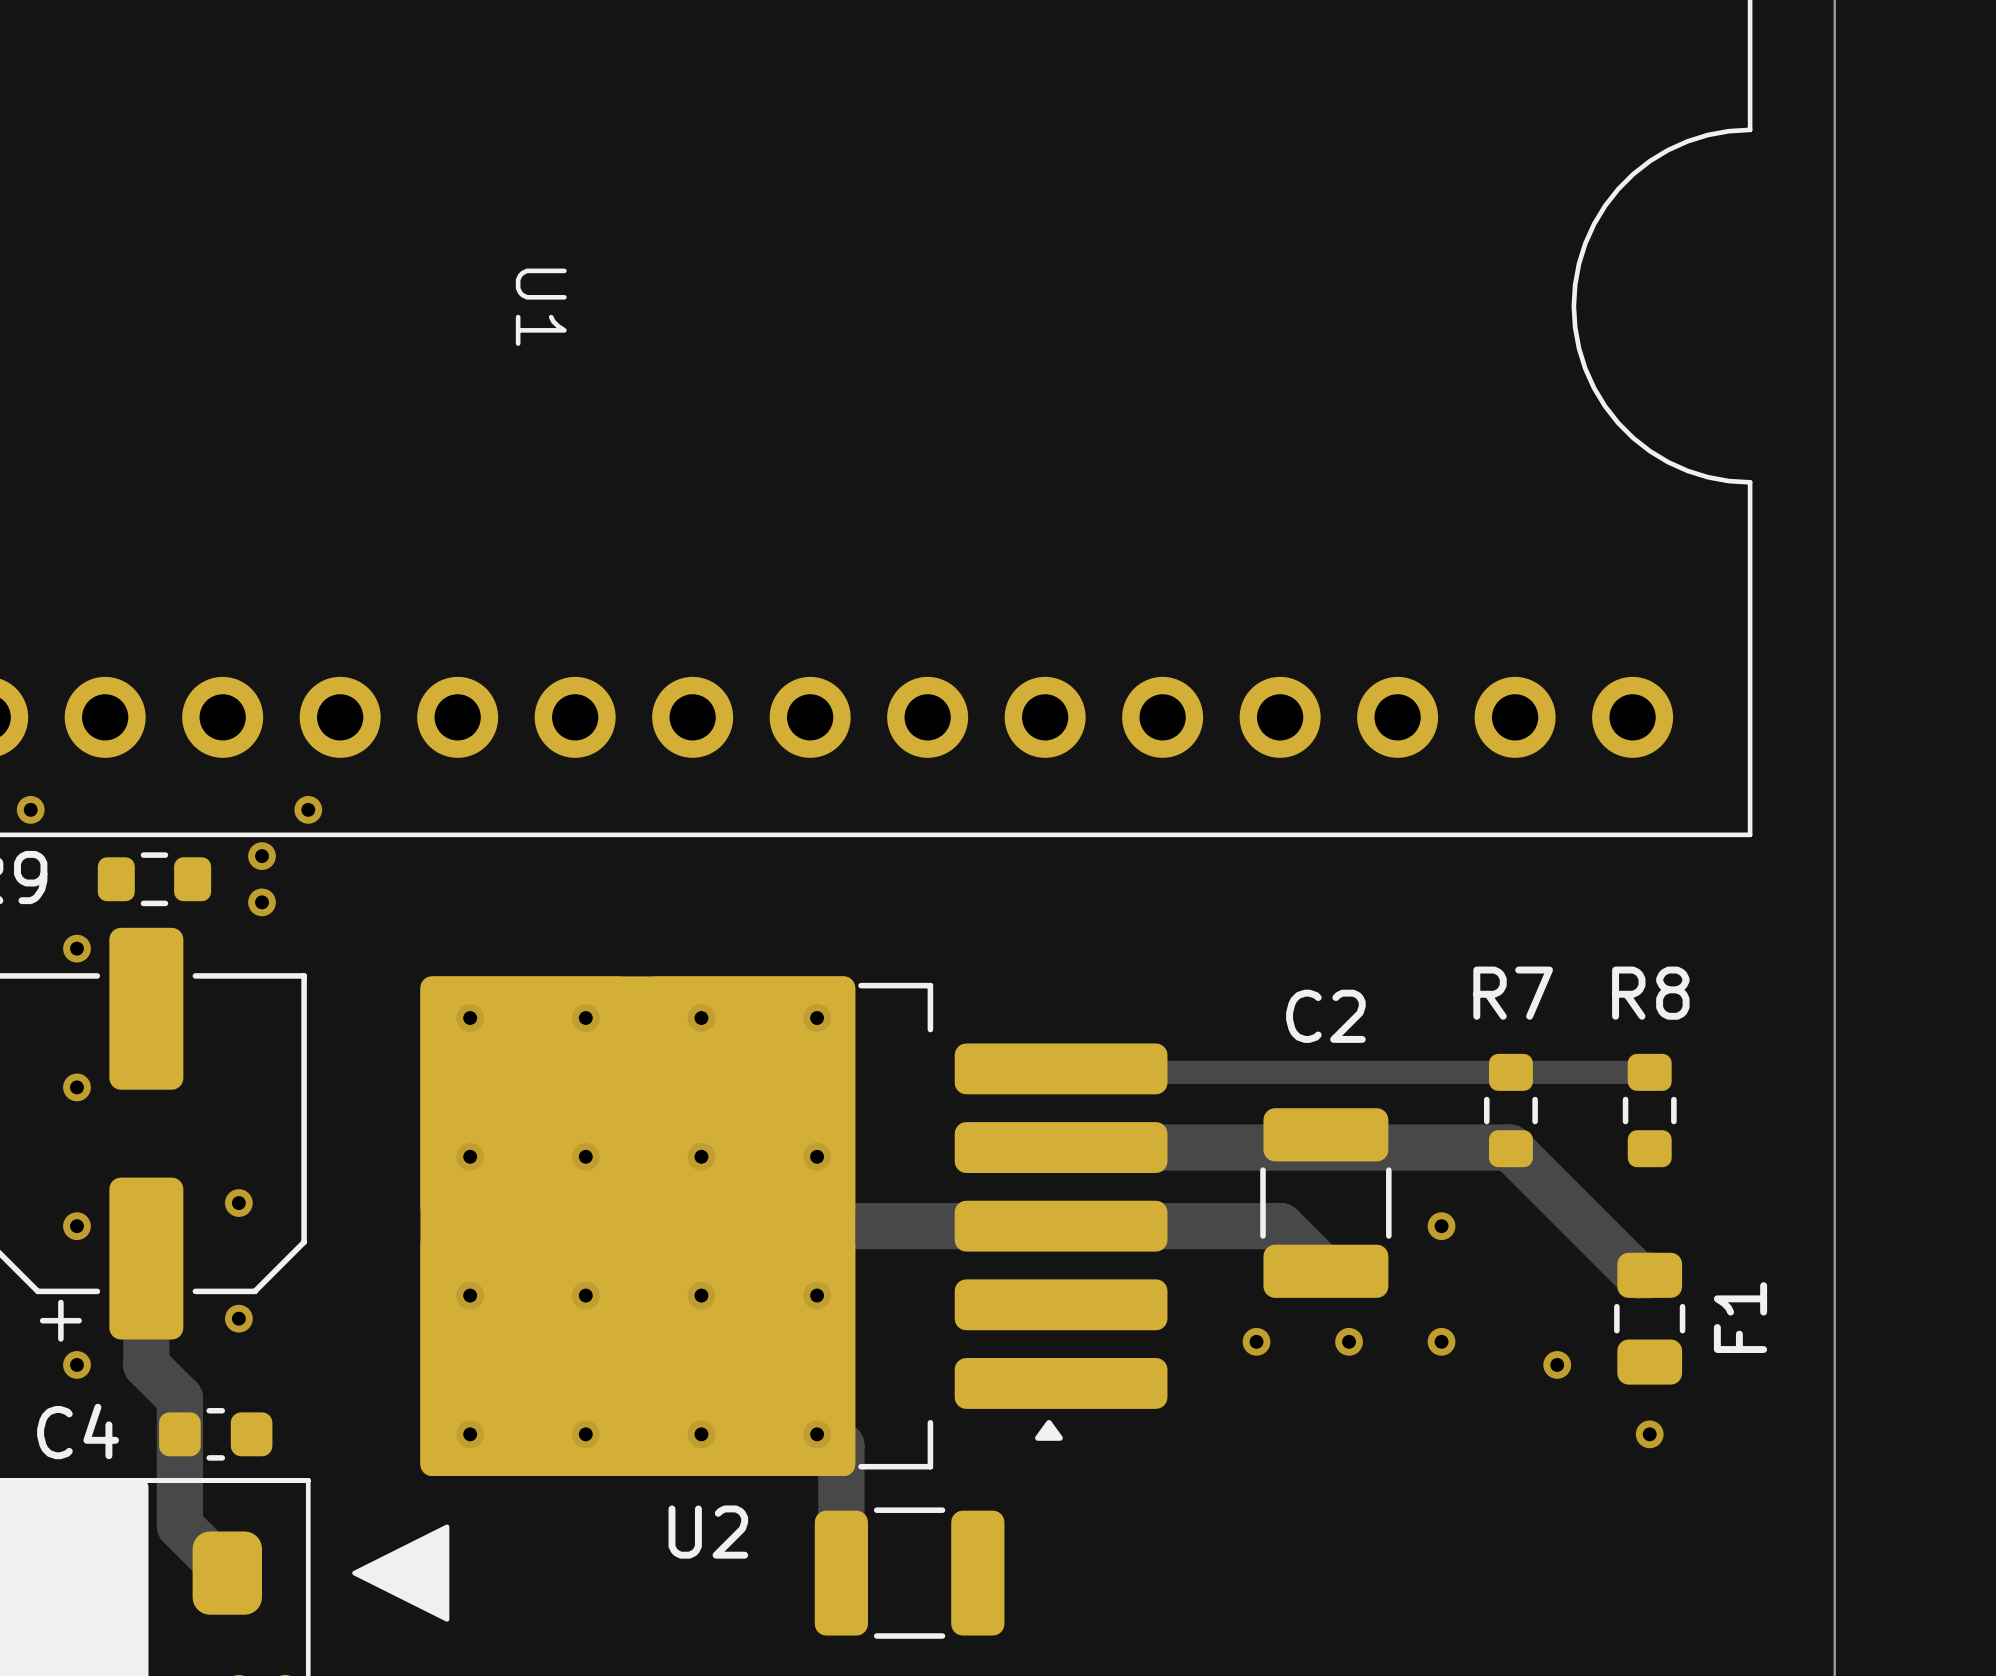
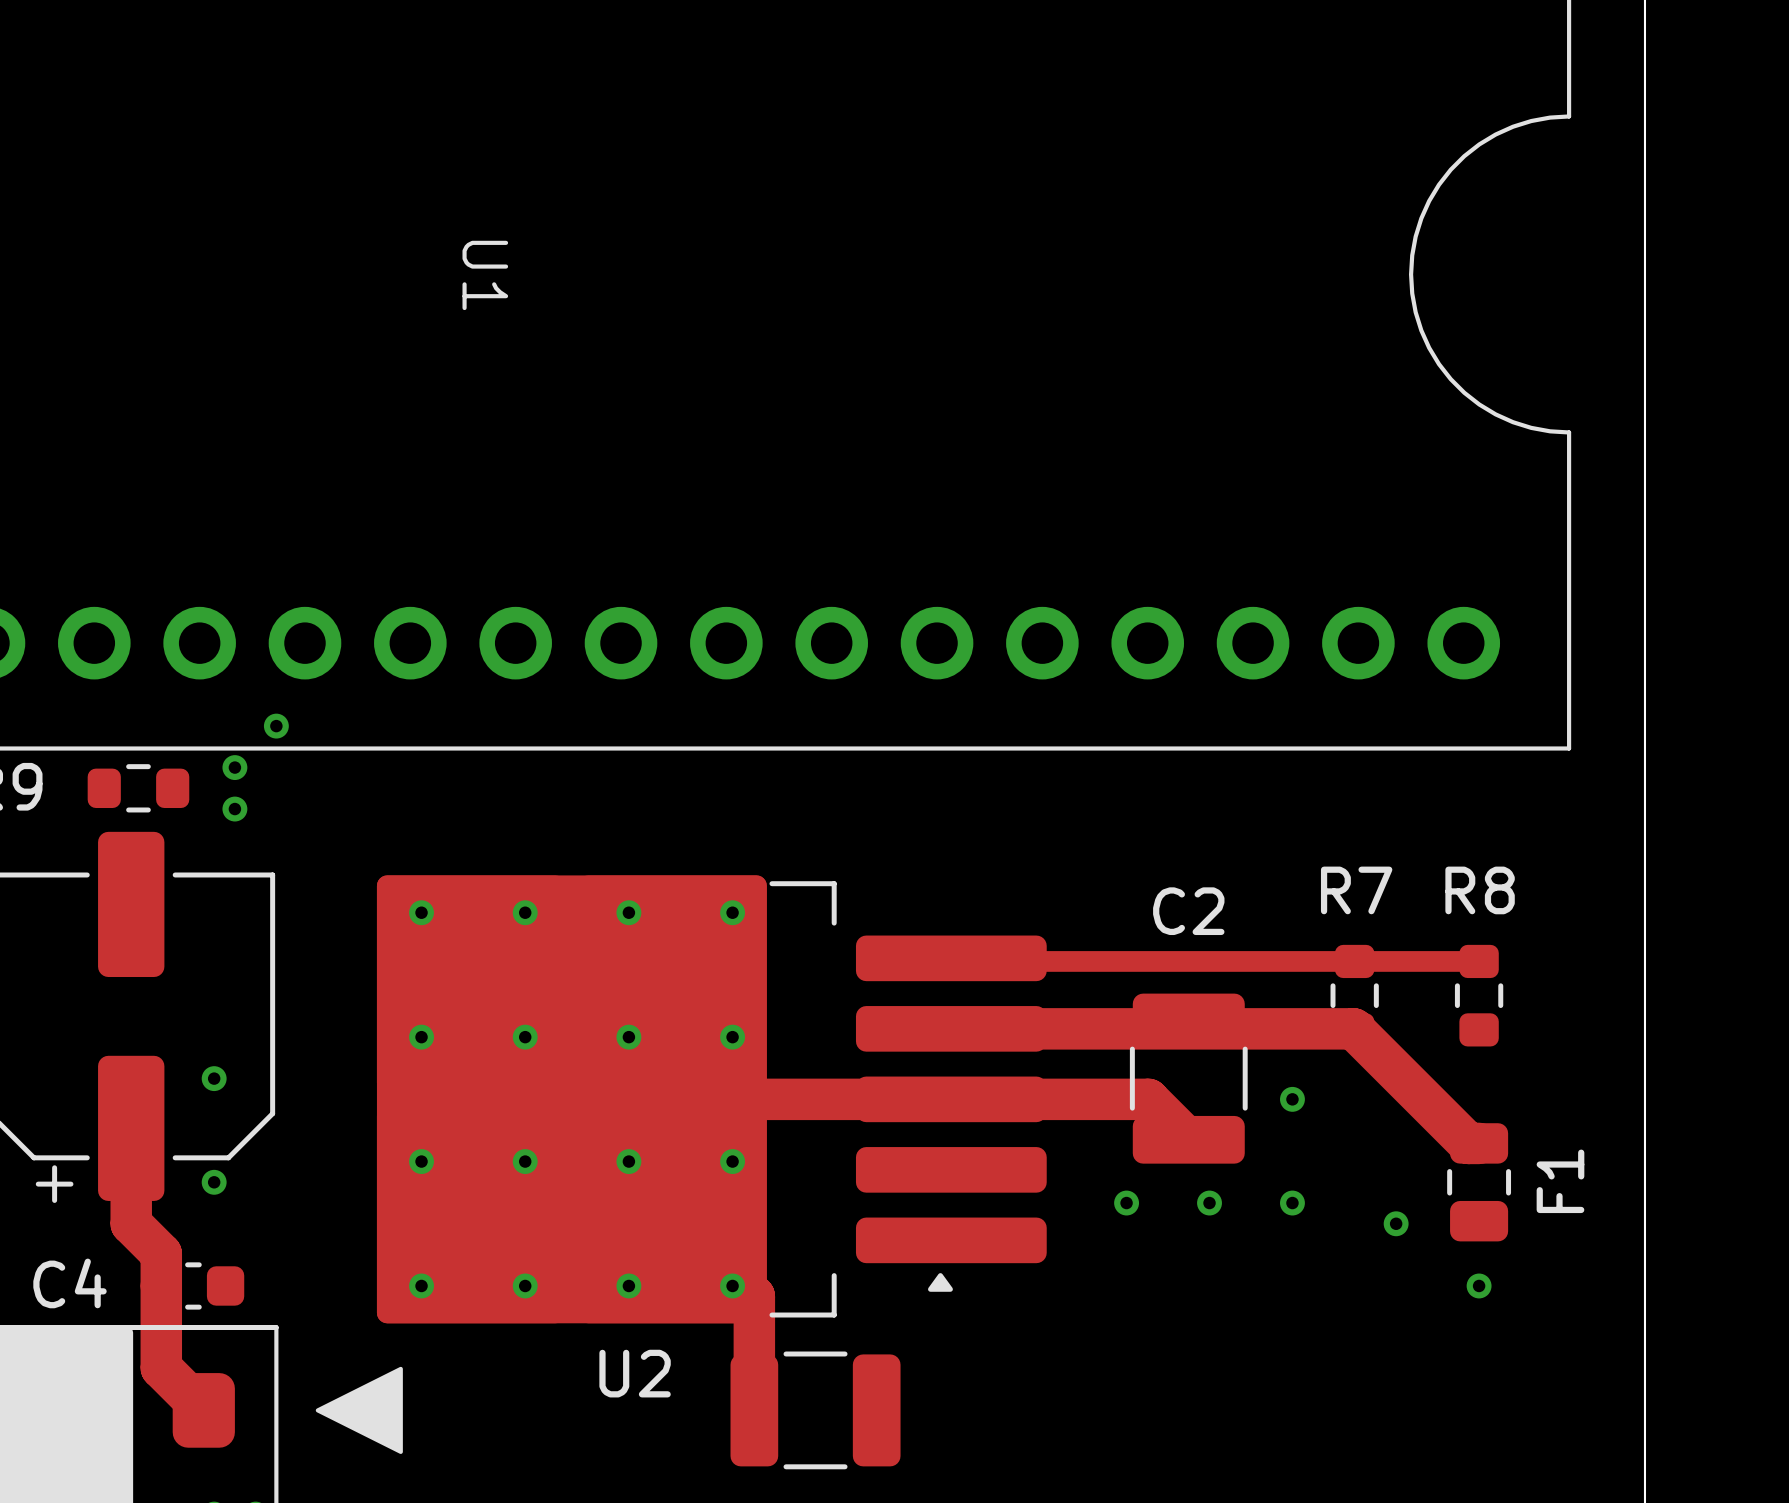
via: (30, 809) -> none
via: (76, 948) -> none
via: (76, 1087) -> none
via: (76, 1226) -> none
via: (76, 1364) -> none

